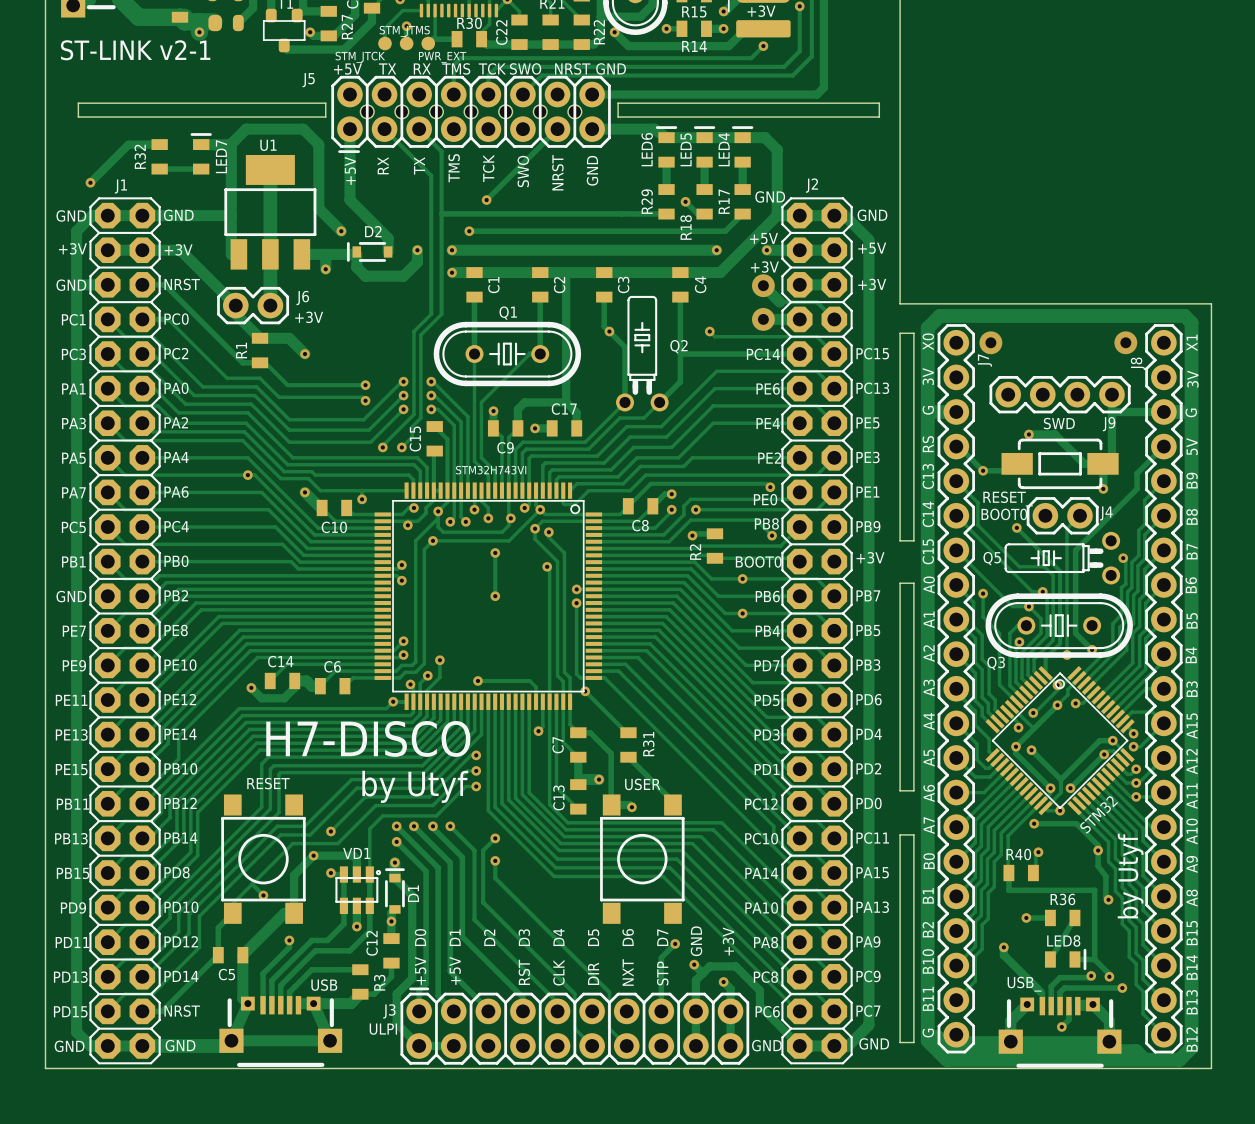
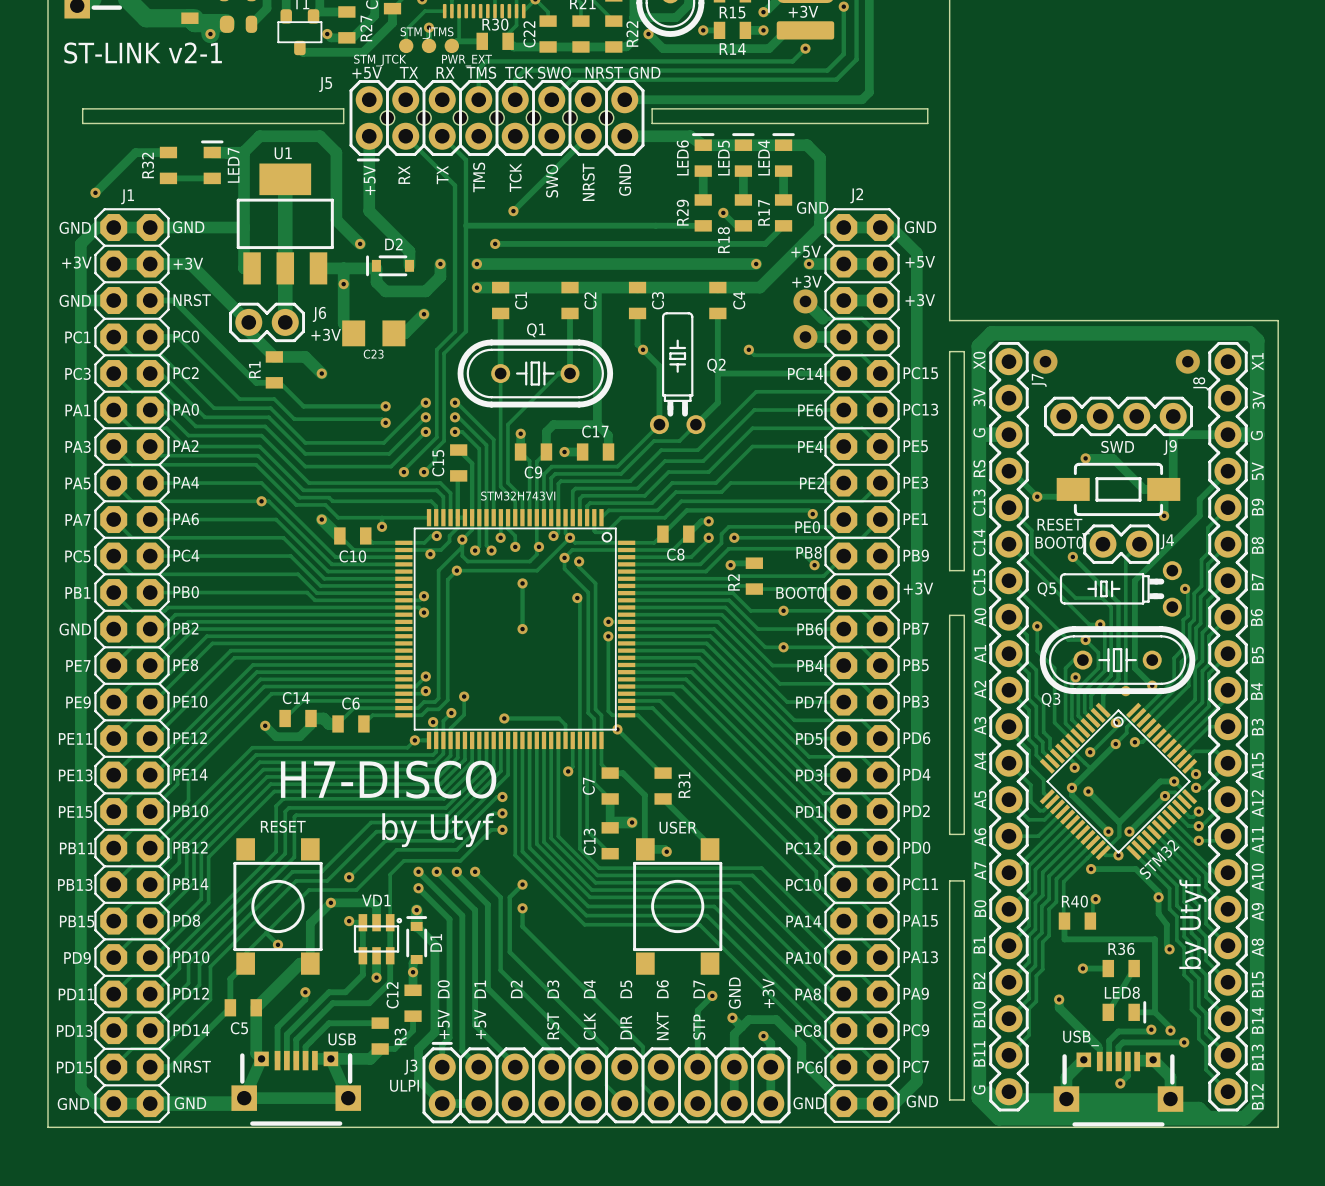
track: none -> (343, 284) (343, 323) (353, 333)
track: none -> (423, 314) (404, 333) (393, 333)
via: none -> (423, 314)
C23: none -> (373, 333)

